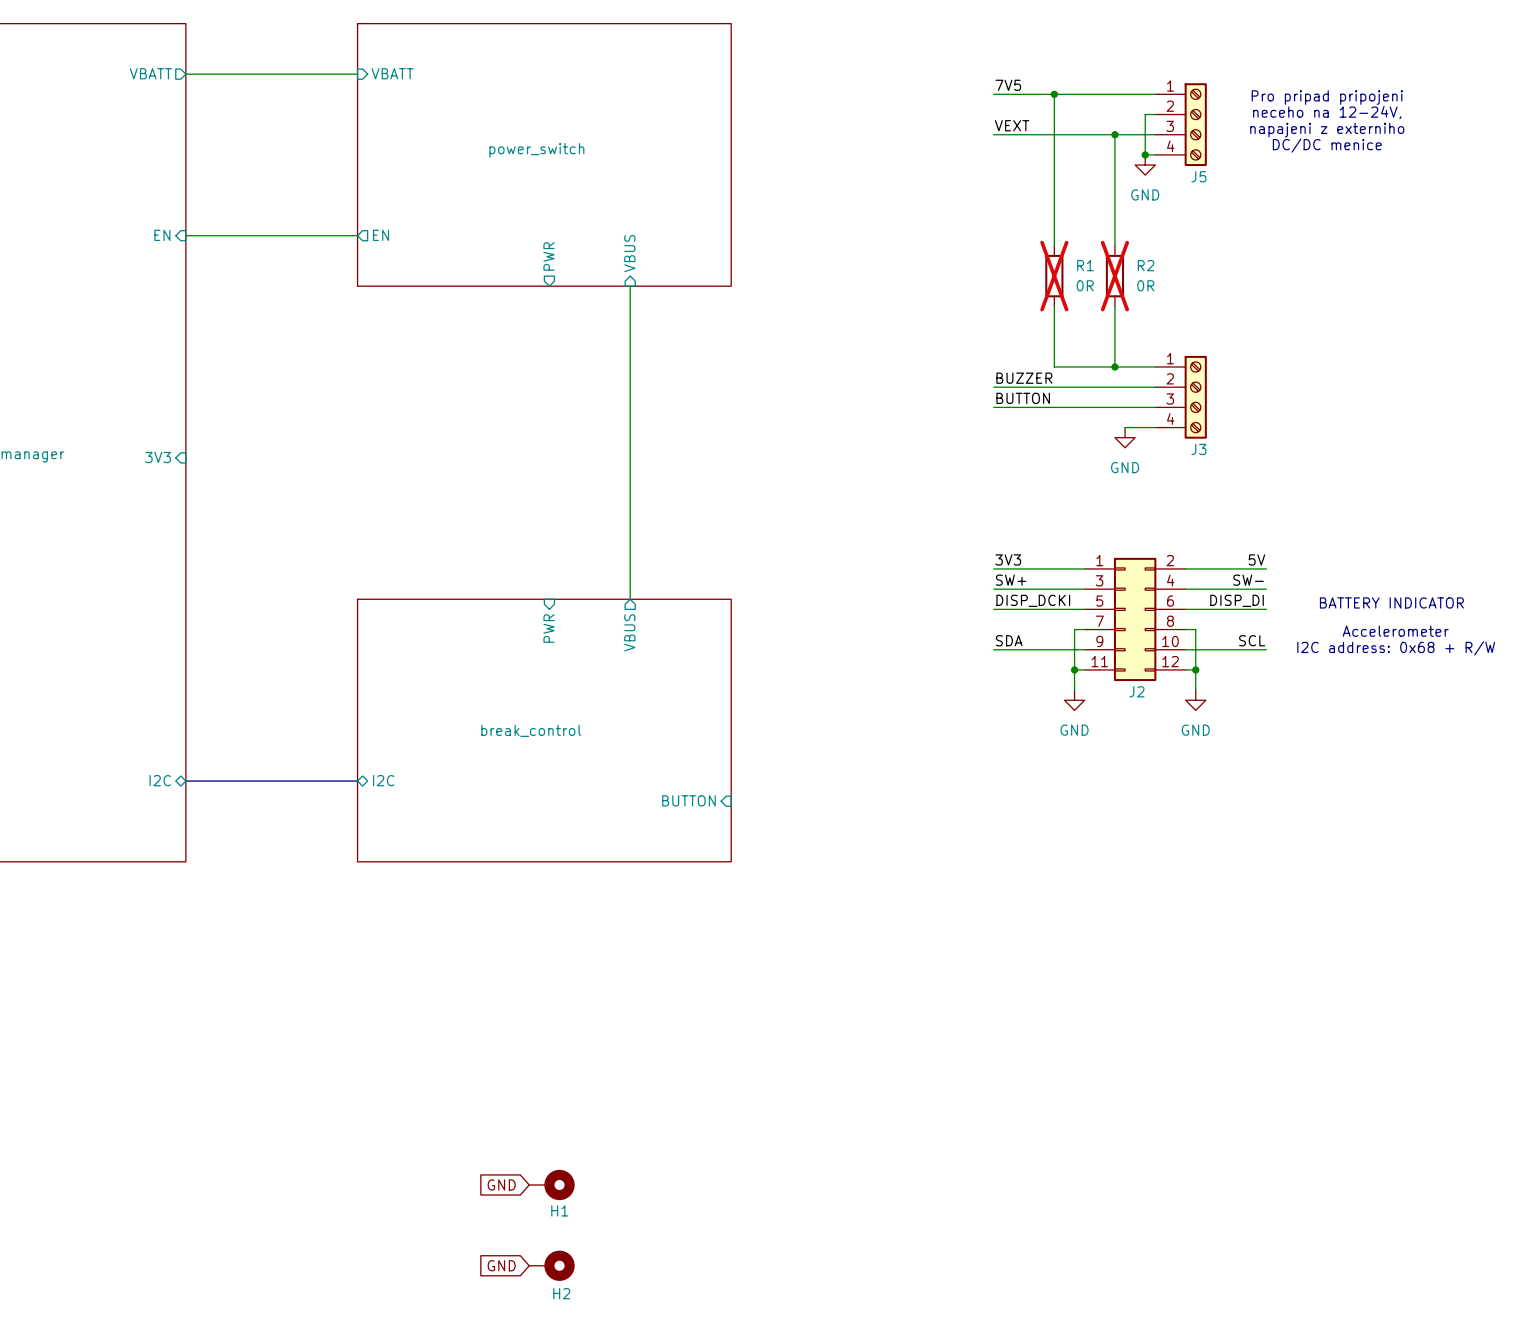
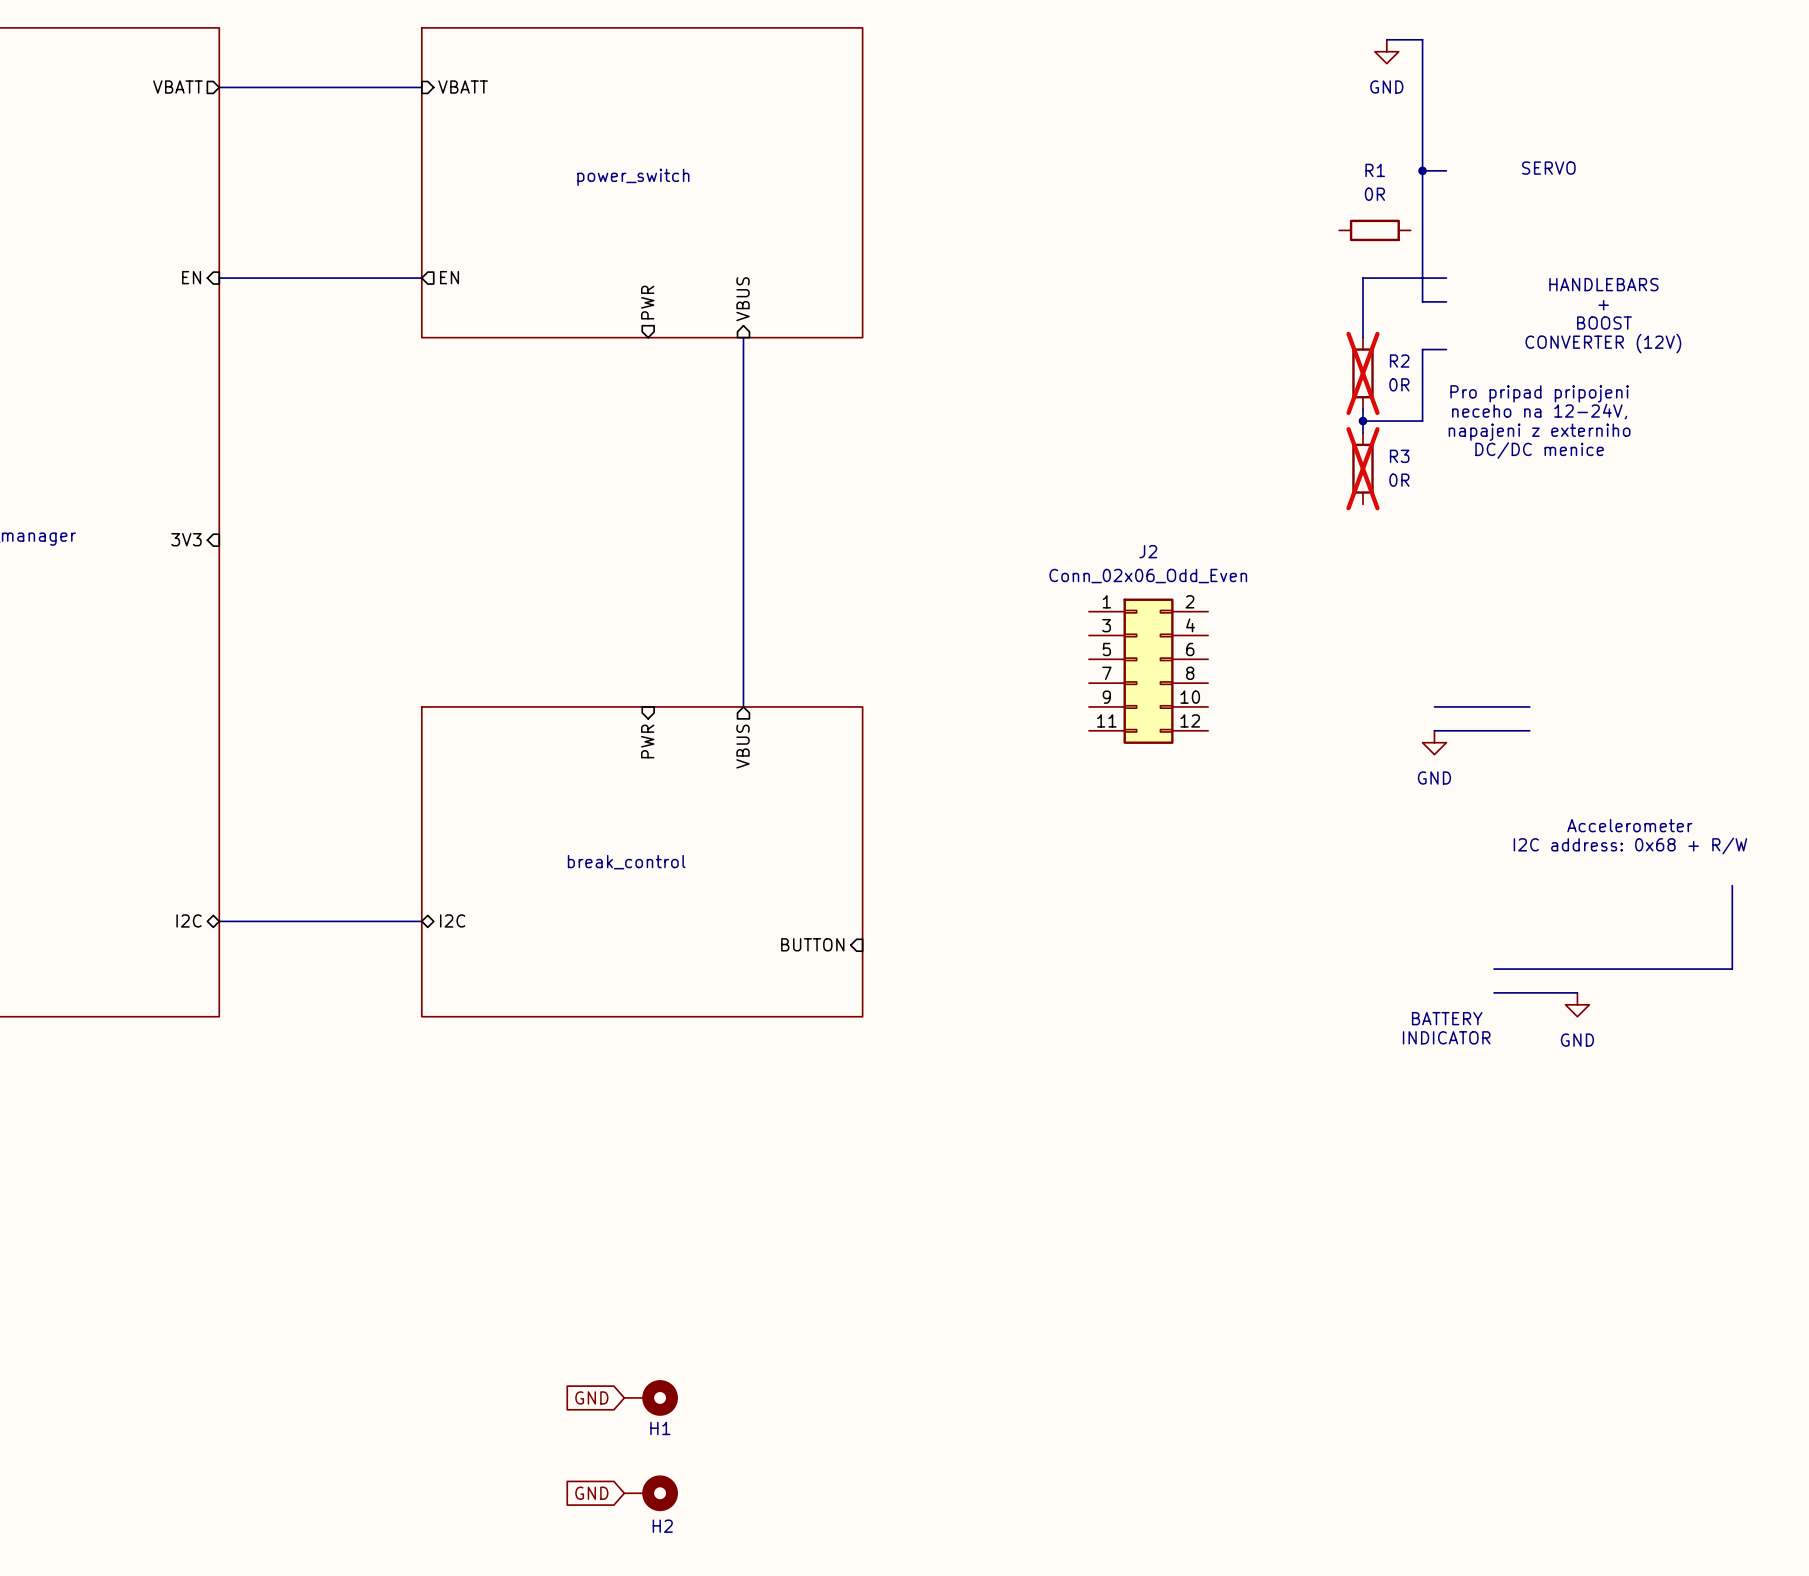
wire: none -> (1386, 39) (1422, 39) (1422, 301) (1446, 301)
label: 7V5 (1008, 85) -> none
wire: (993, 94) (1155, 94) -> none
wire: (1054, 94) (1054, 245) -> none
junction: (1054, 94) -> none
text: Pro pripad pripojeni (1327, 97) -> none
text: neceho na 12-24V, (1327, 112) -> none
wire: (1155, 114) (1145, 114) (1145, 154) (1155, 154) -> none
J5: (1181, 124) -> none
label: VEXT (1012, 125) -> none
text: napajeni z externiho (1327, 130) -> none
wire: (993, 134) (1155, 134) -> none
wire: (1114, 134) (1114, 245) -> none
junction: (1114, 134) -> none
text: none -> SERVO (1548, 168)
wire: none -> (1422, 170) (1446, 170)
junction: none -> (1422, 170)
text: DC/DC menice (1327, 145) -> none
junction: (1145, 154) -> none
power symbol position: GND (1145, 165) -> GND (1386, 51)
wire: none -> (1446, 278) (1362, 278) (1362, 337)
text: none -> HANDLEBARS (1603, 284)
text: none -> + (1603, 305)
R1 name position: R1 (1085, 265) -> R1 (1375, 170)
text: none -> BOOST (1604, 323)
R1 rotation: 0° (1054, 276) -> 90° clockwise (1374, 230)
R1 position: (1054, 276) -> (1374, 230)
R1 do-not-place cross: (1054, 276) -> none
R2 position: (1114, 276) -> (1362, 373)
R1 value position: 0R (1085, 285) -> 0R (1374, 194)
text: none -> CONVERTER (12V) (1603, 343)
wire: none -> (1446, 349) (1422, 349) (1422, 421) (1362, 421)
wire: (1054, 306) (1054, 366) (1155, 366) -> (1362, 409) (1362, 432)
wire: (1114, 306) (1114, 366) -> none
text: none -> Pro pripad pripojeni (1539, 393)
text: none -> neceho na 12-24V, (1539, 411)
junction position: (1114, 366) -> (1362, 421)
text: none -> napajeni z externiho (1539, 432)
label: BUZZER (1024, 378) -> none
text: none -> DC/DC menice (1539, 450)
wire: (993, 387) (1155, 387) -> none
R3: none -> 0R (1362, 468)
J3: (1181, 397) -> none
label: BUTTON (1023, 398) -> none
wire: (993, 407) (1155, 407) -> none
wire: (1125, 427) (1155, 427) -> none
power symbol: GND (1125, 437) -> none
J2 value: none -> Conn_02x06_Odd_Even (1148, 576)
label: 3V3 (1008, 559) -> none
label: 5V (1256, 559) -> none
wire: (993, 568) (1084, 568) -> none
wire: (1185, 568) (1266, 568) -> none
label: SW+ (1011, 580) -> none
label: SW- (1248, 580) -> none
wire: (993, 589) (1084, 589) -> none
wire: (1185, 589) (1266, 589) -> (1434, 706) (1529, 706)
label: DISP_DCKI (1033, 600) -> none
label: DISP_DI (1237, 600) -> none
text: BATTERY INDICATOR (1391, 602) -> none
wire: (993, 609) (1084, 609) -> none
wire: (1185, 609) (1266, 609) -> (1434, 730) (1529, 730)
J2 position: (1135, 619) -> (1148, 671)
wire: (1084, 629) (1074, 629) (1074, 690) -> none
wire: (1185, 629) (1195, 629) (1195, 690) -> none
text position: Accelerometer (1395, 631) -> Accelerometer (1629, 825)
label: SDA (1009, 640) -> none
label: SCL (1252, 640) -> none
text position: I2C address: 0x68 + R/W (1396, 648) -> I2C address: 0x68 + R/W (1630, 845)
wire: (993, 649) (1084, 649) -> none
wire: (1185, 649) (1266, 649) -> none
wire: (1074, 669) (1084, 669) -> none
junction: (1074, 669) -> none
wire: (1185, 669) (1195, 669) -> none
junction: (1195, 669) -> none
J2 name position: J2 (1136, 691) -> J2 (1148, 551)
power symbol: GND (1074, 700) -> none
power symbol position: GND (1195, 700) -> GND (1434, 742)
wire: none -> (1732, 885) (1732, 969) (1494, 969)
wire: none -> (1494, 992) (1577, 992)
power symbol: none -> GND (1577, 1004)
text: none -> BATTERY (1447, 1018)
text: none -> INDICATOR (1446, 1037)

